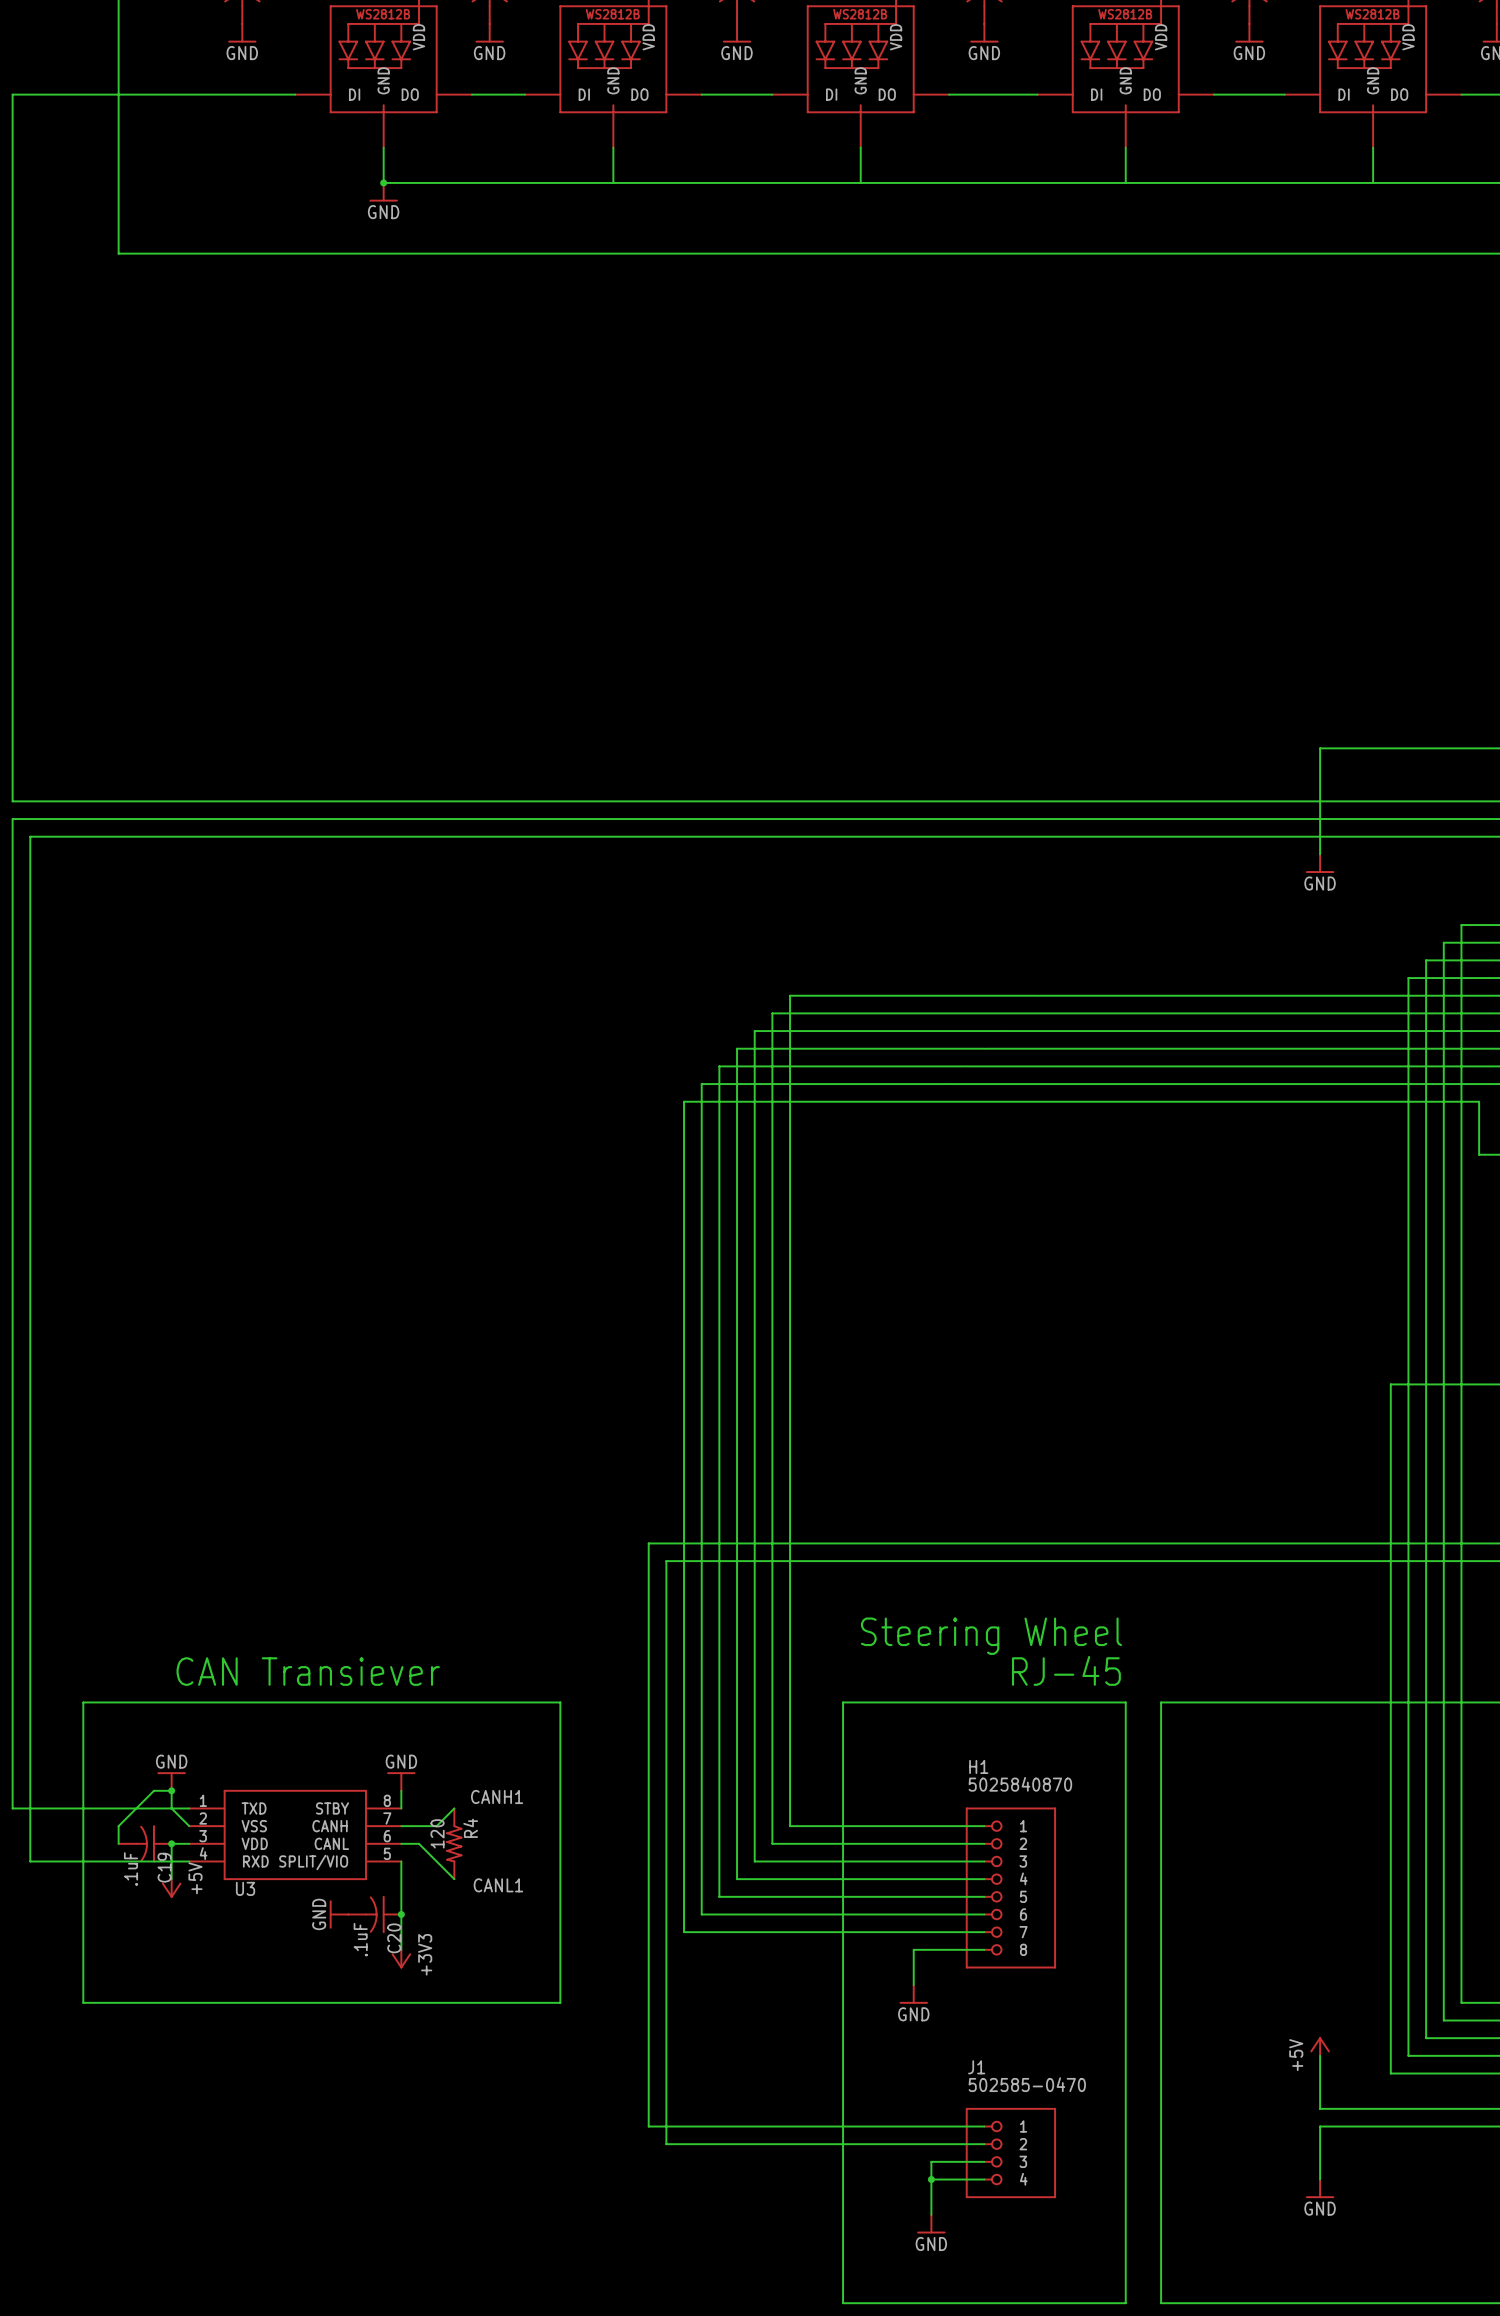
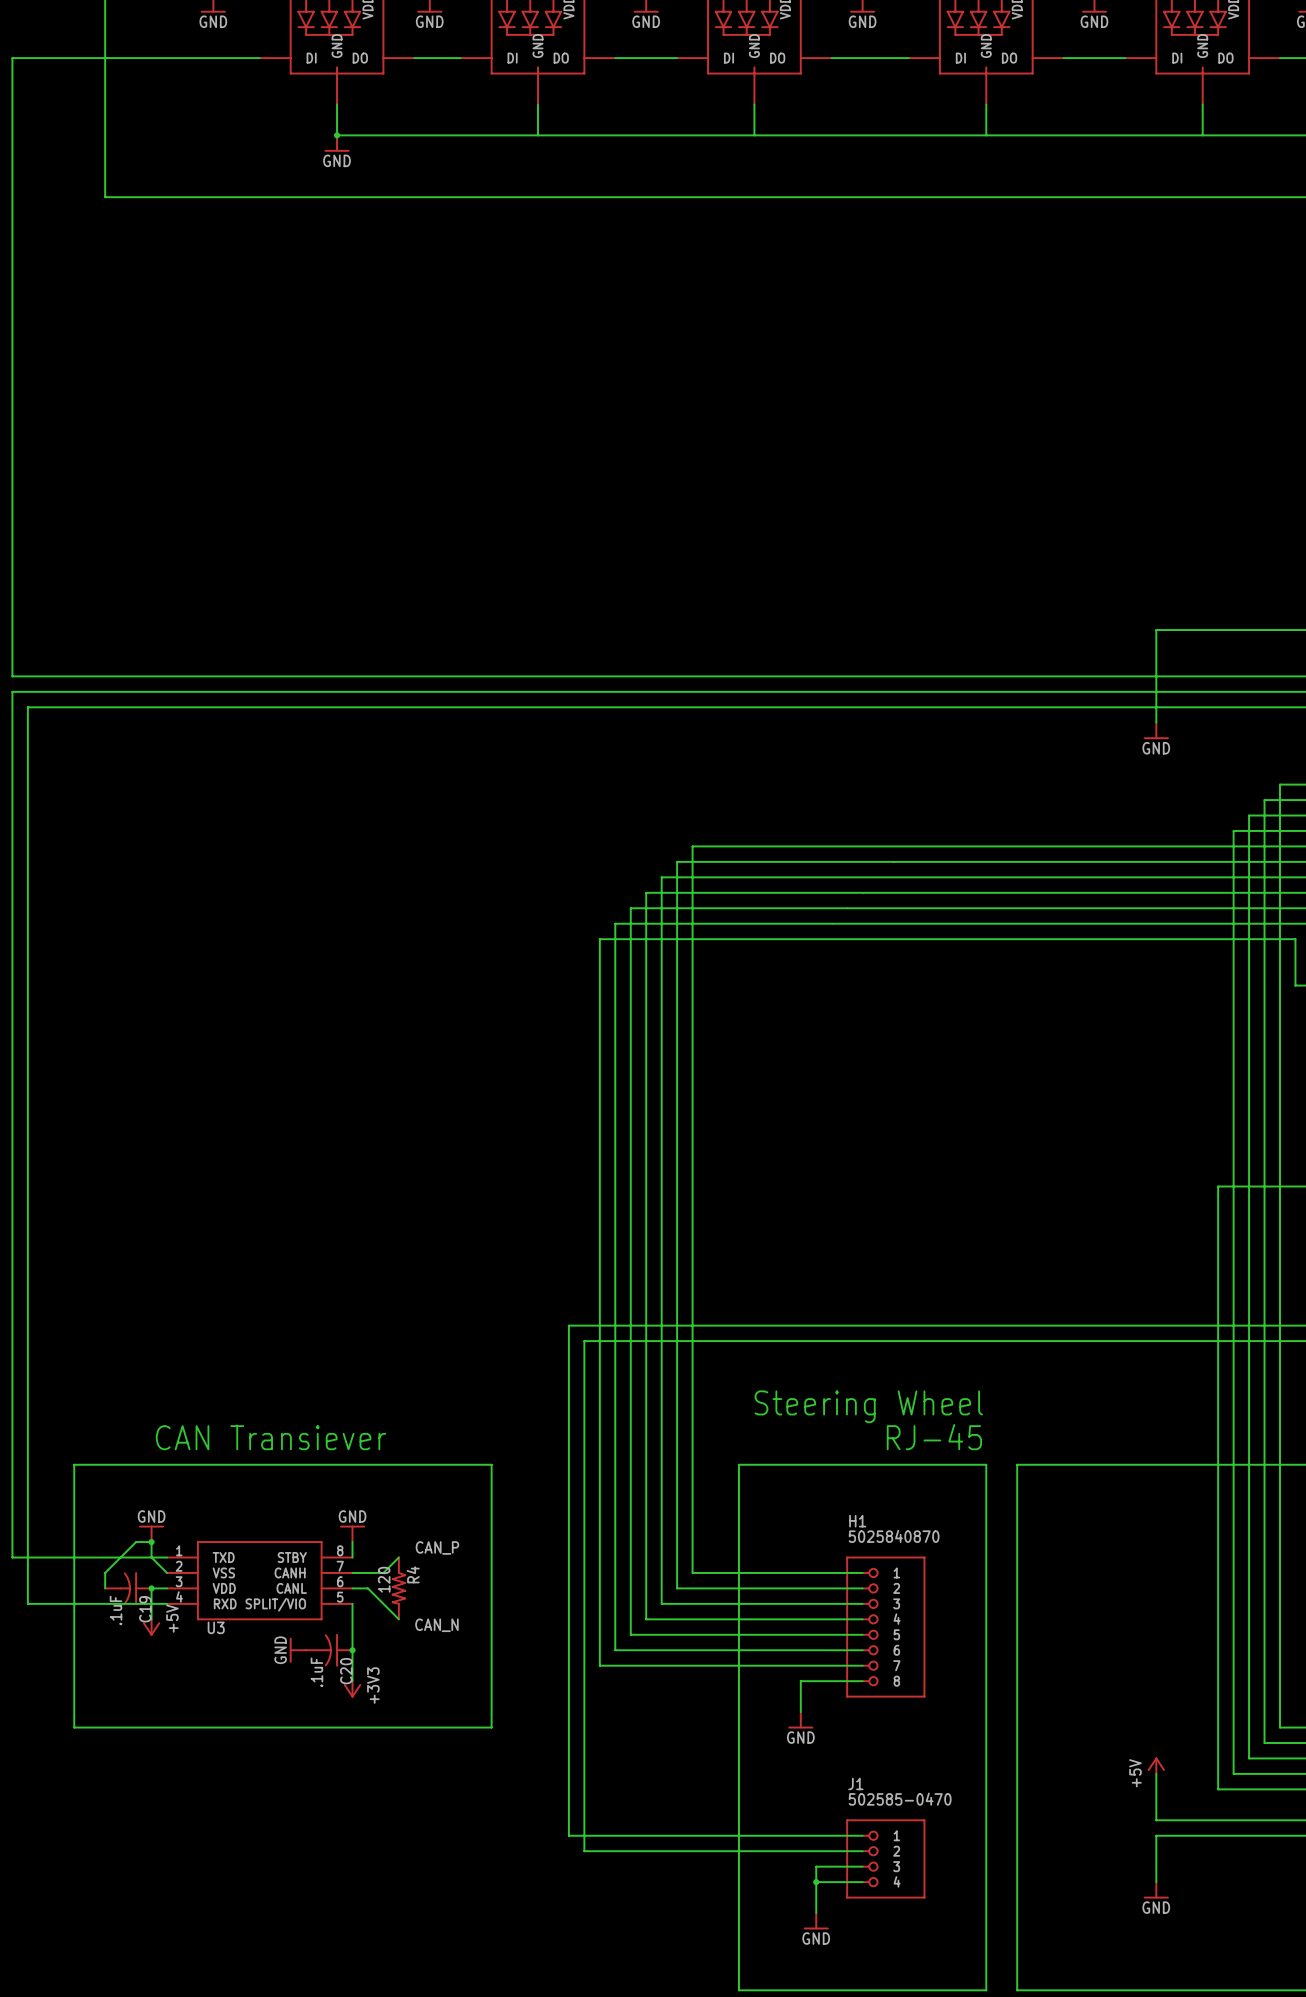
label: CANH1 (497, 1796) -> CAN_P (437, 1547)
label: CANL1 (498, 1885) -> CAN_N (436, 1625)

